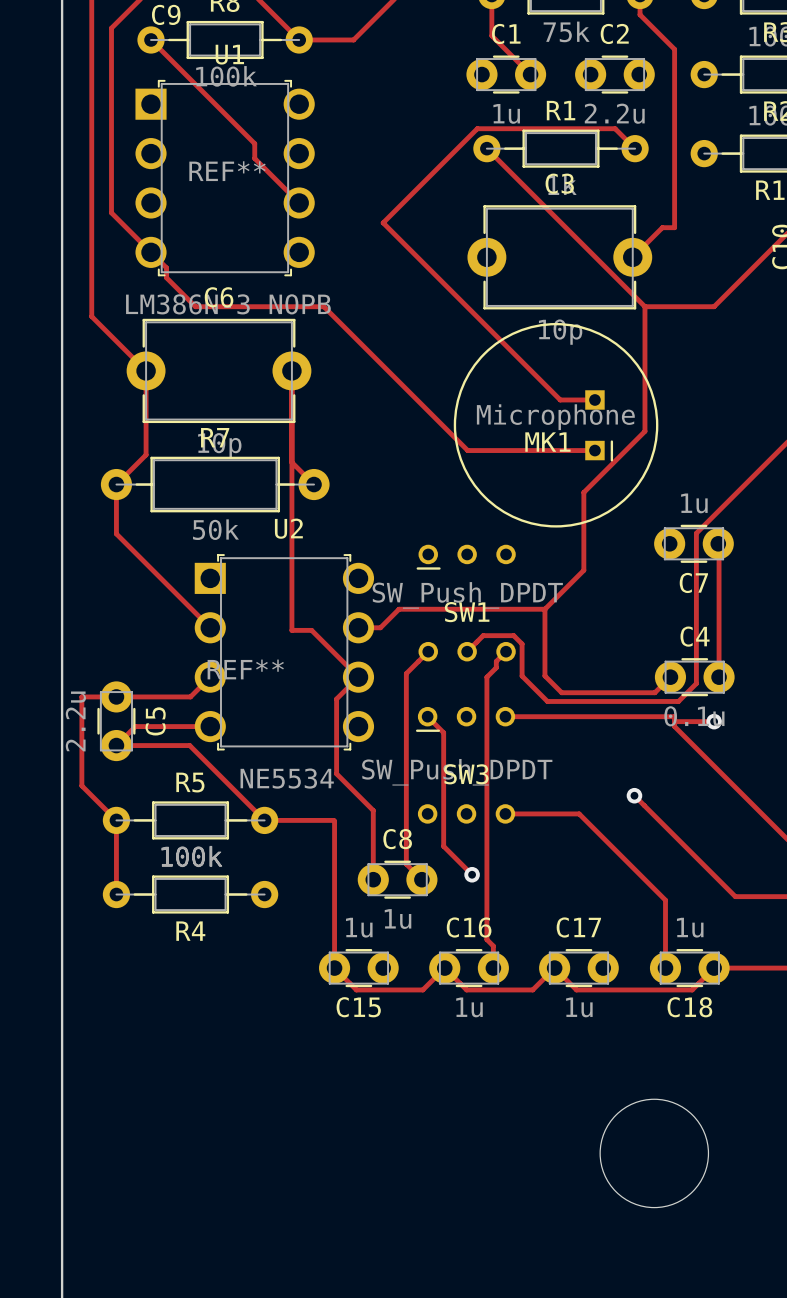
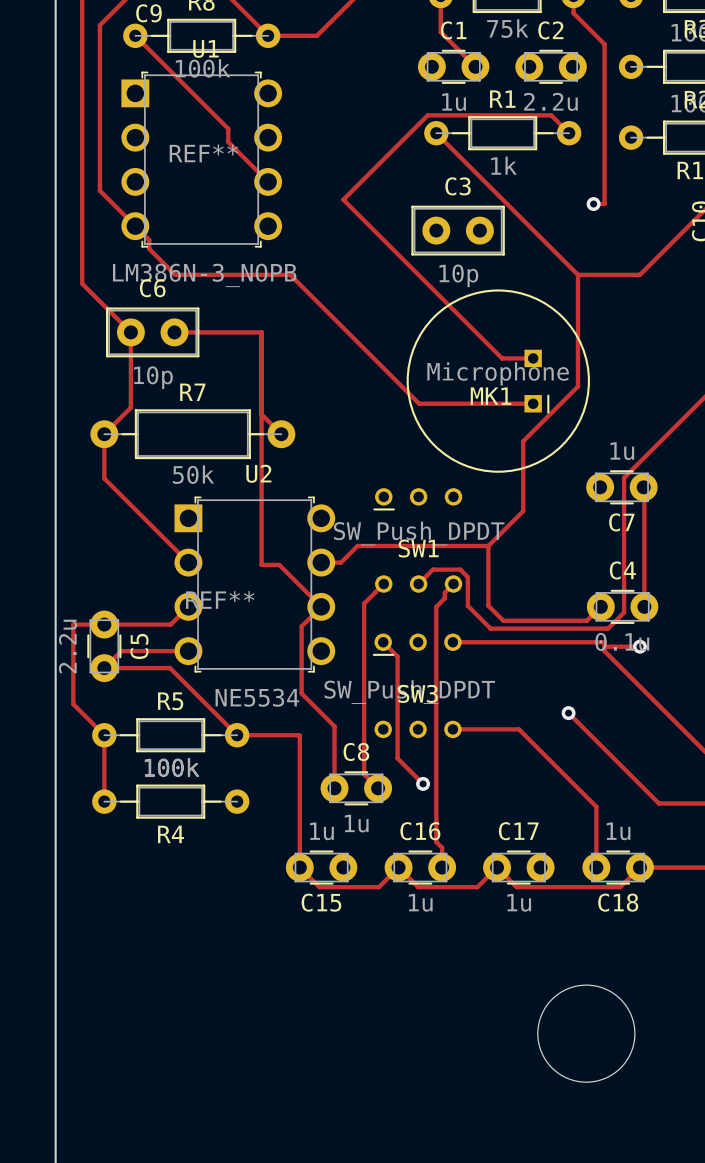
C3 footprint: [467, 205, 653, 310] -> [411, 205, 505, 256]
track: (662, 227) (632, 257) -> none
via: none -> (593, 204)
C6 footprint: [126, 318, 312, 424] -> [105, 307, 200, 358]
track: none -> (174, 332) (261, 332)

